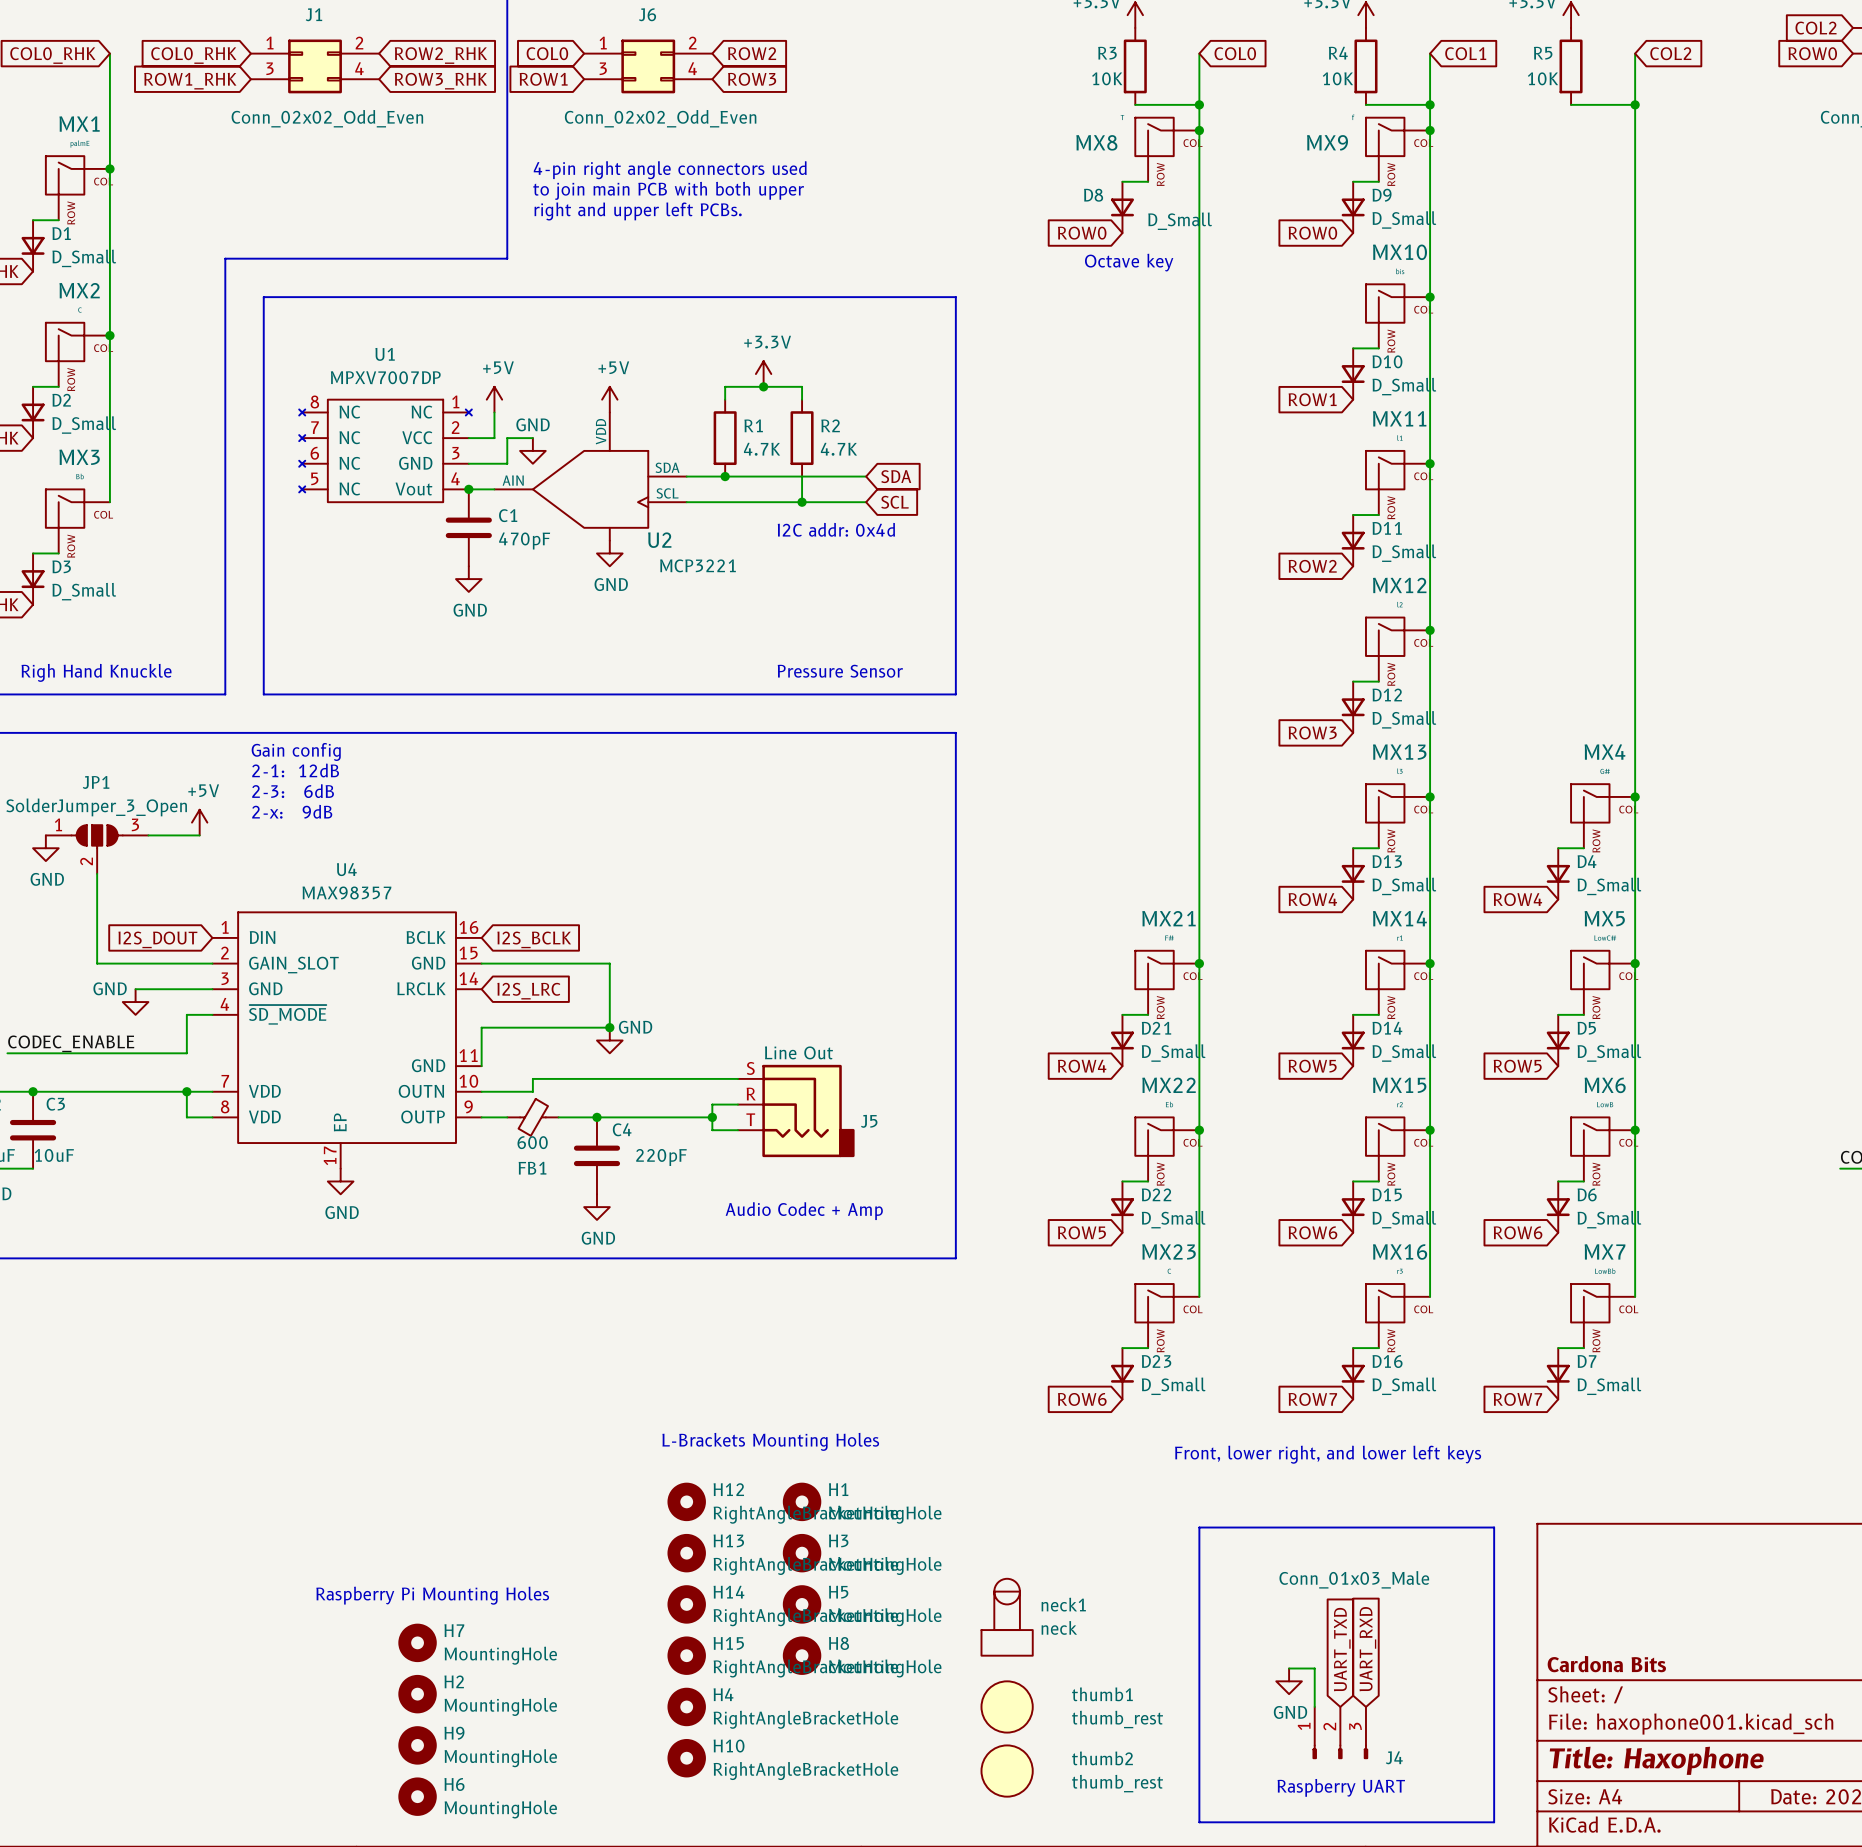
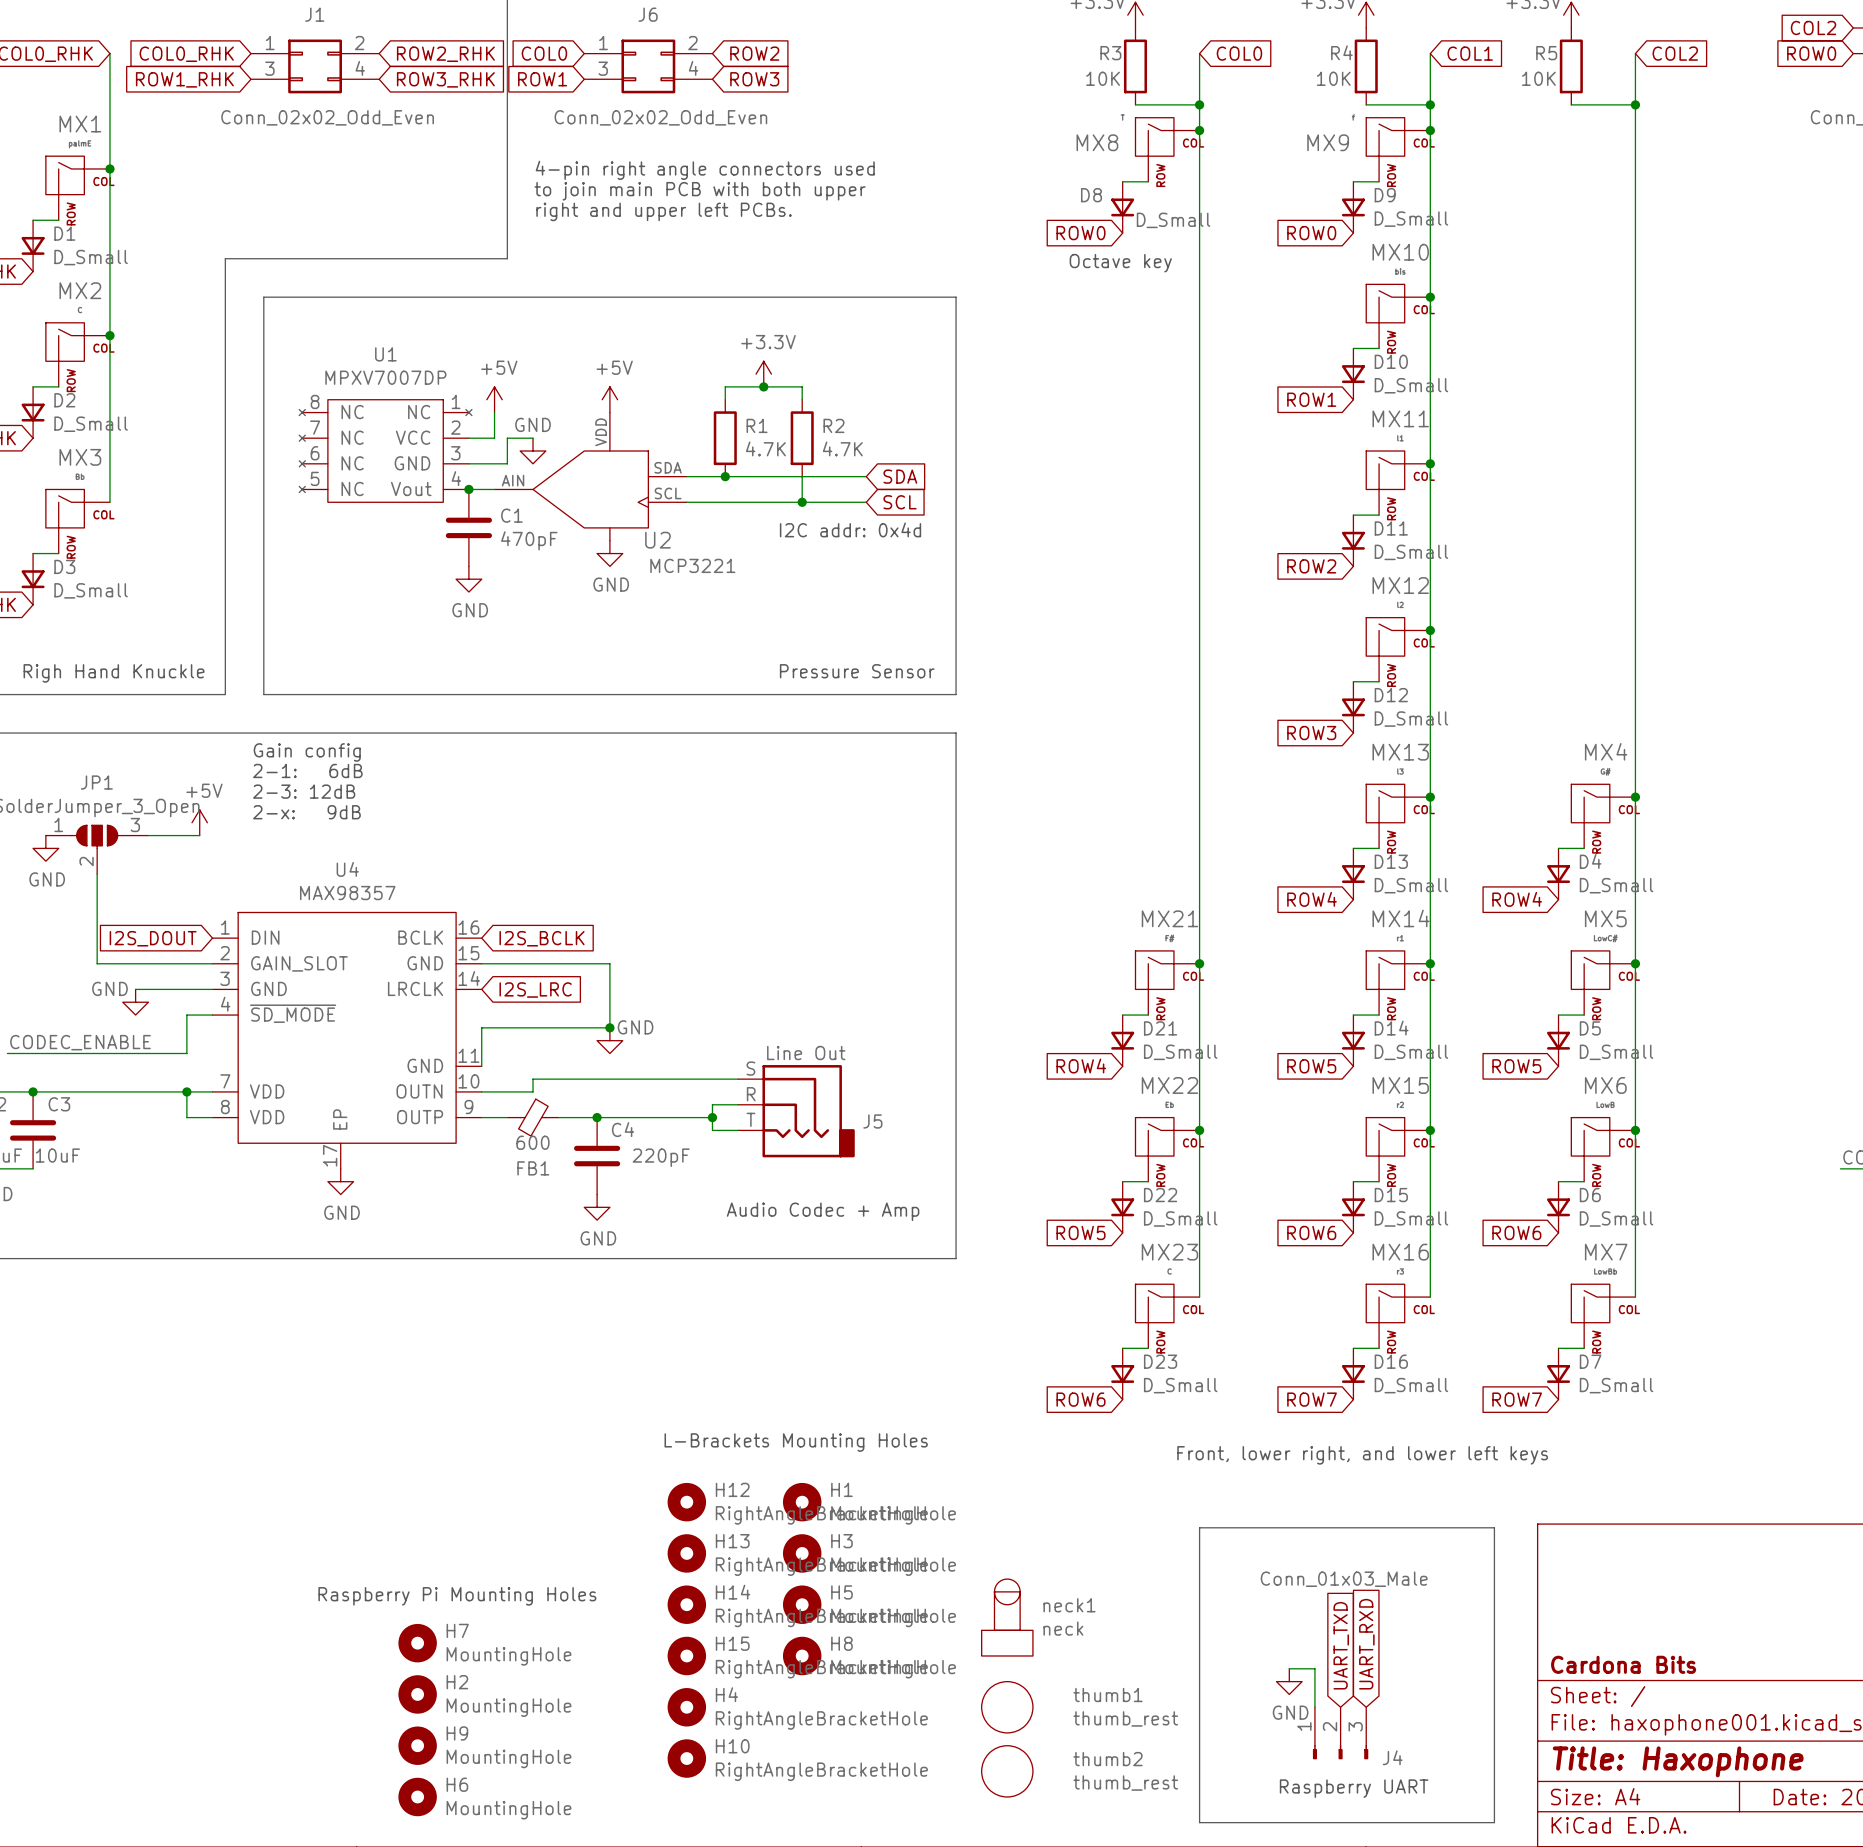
text: 2-1: 12dB (295, 770) -> 2-1: 6dB (307, 770)
text: 2-3: 6dB (293, 791) -> 2-3: 12dB (304, 791)

